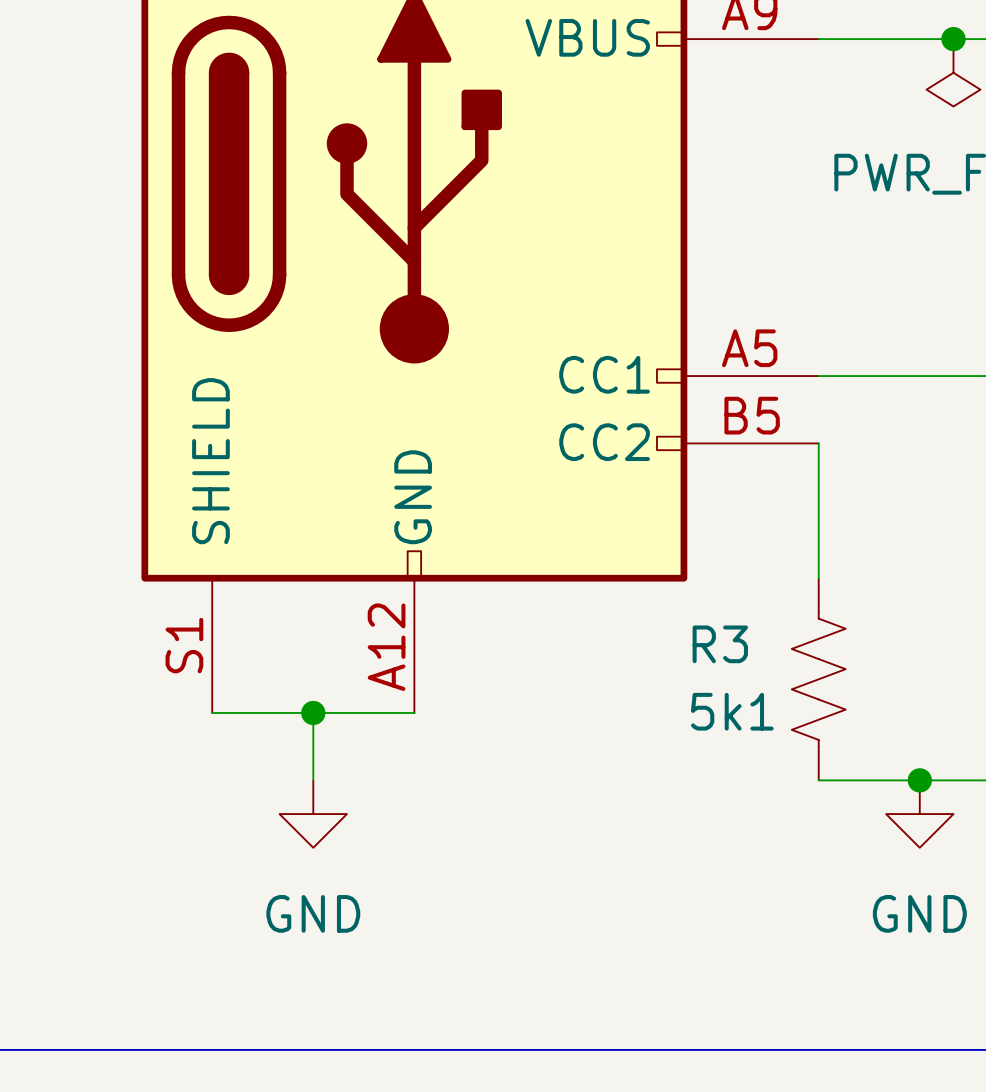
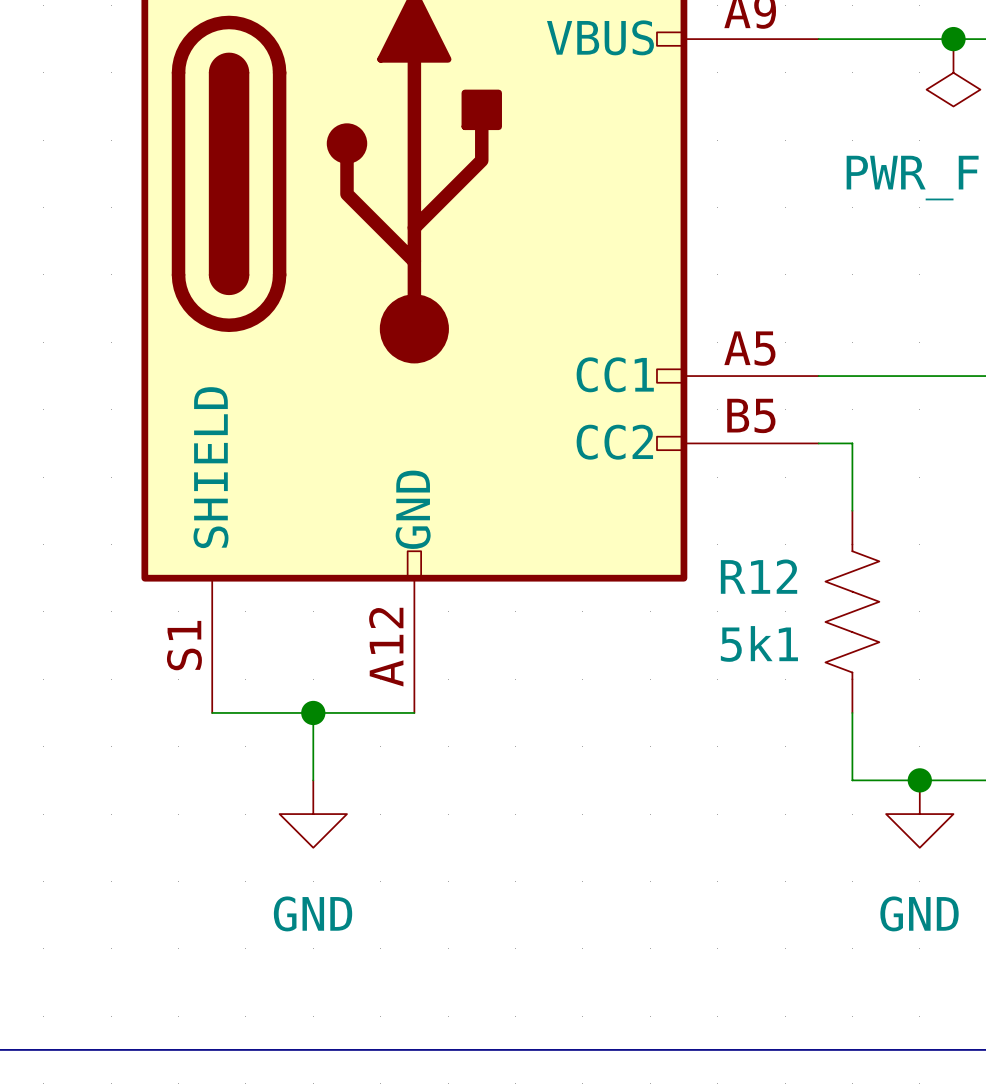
wire: (818, 443) (818, 578) -> (818, 443) (852, 443) (852, 510)
R12: none -> 5k1 (852, 611)
R3: 5k1 (818, 679) -> none
wire: (818, 780) (852, 780) -> (852, 712) (852, 780)

